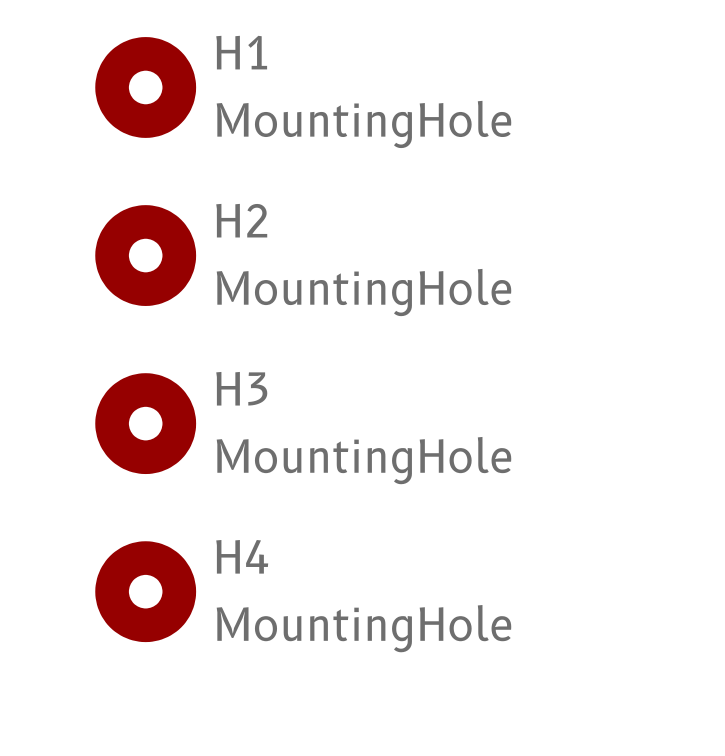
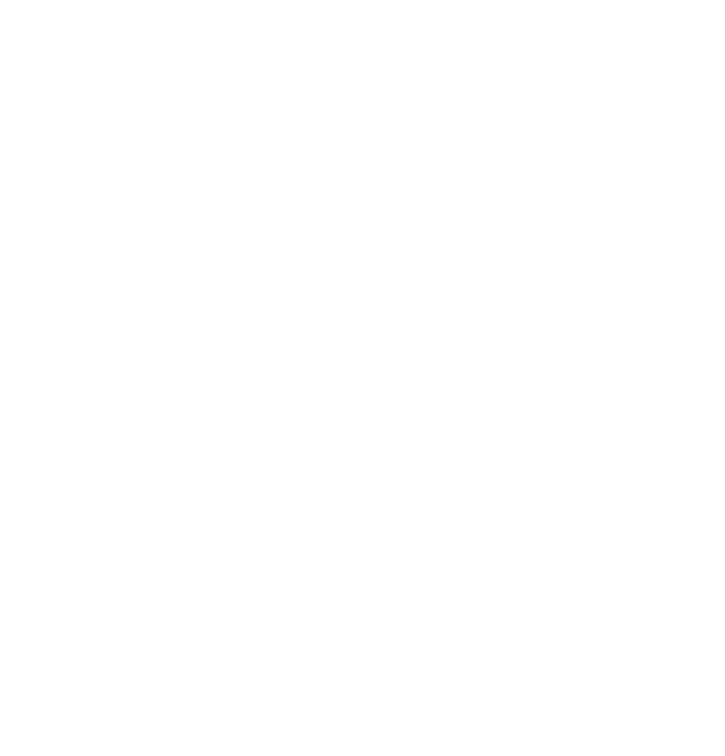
H1: MountingHole (145, 87) -> none
H2: MountingHole (145, 255) -> none
H3: MountingHole (145, 423) -> none
H4: MountingHole (145, 591) -> none

